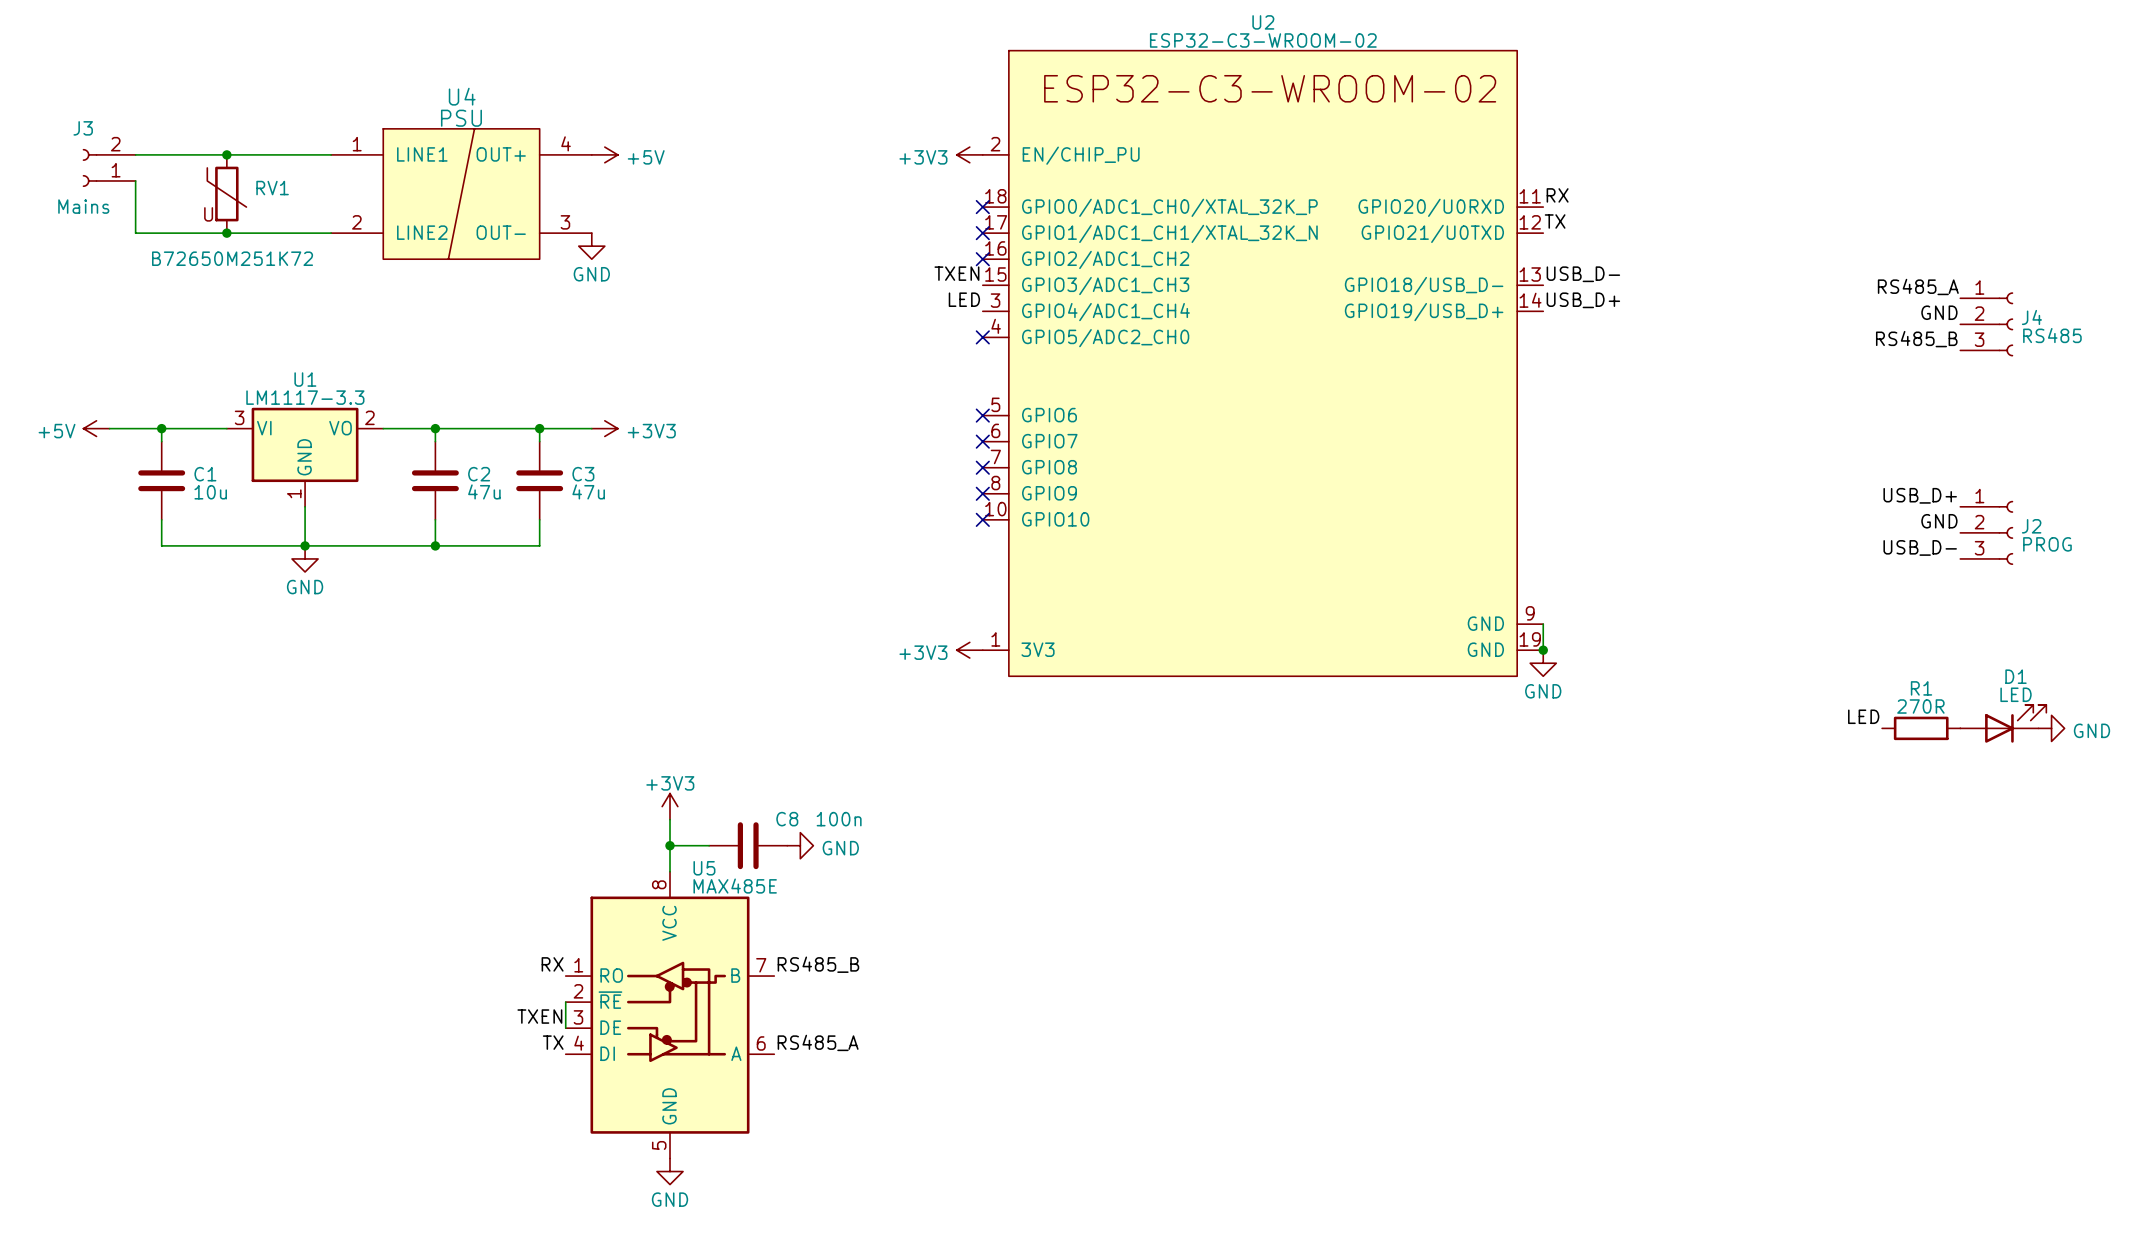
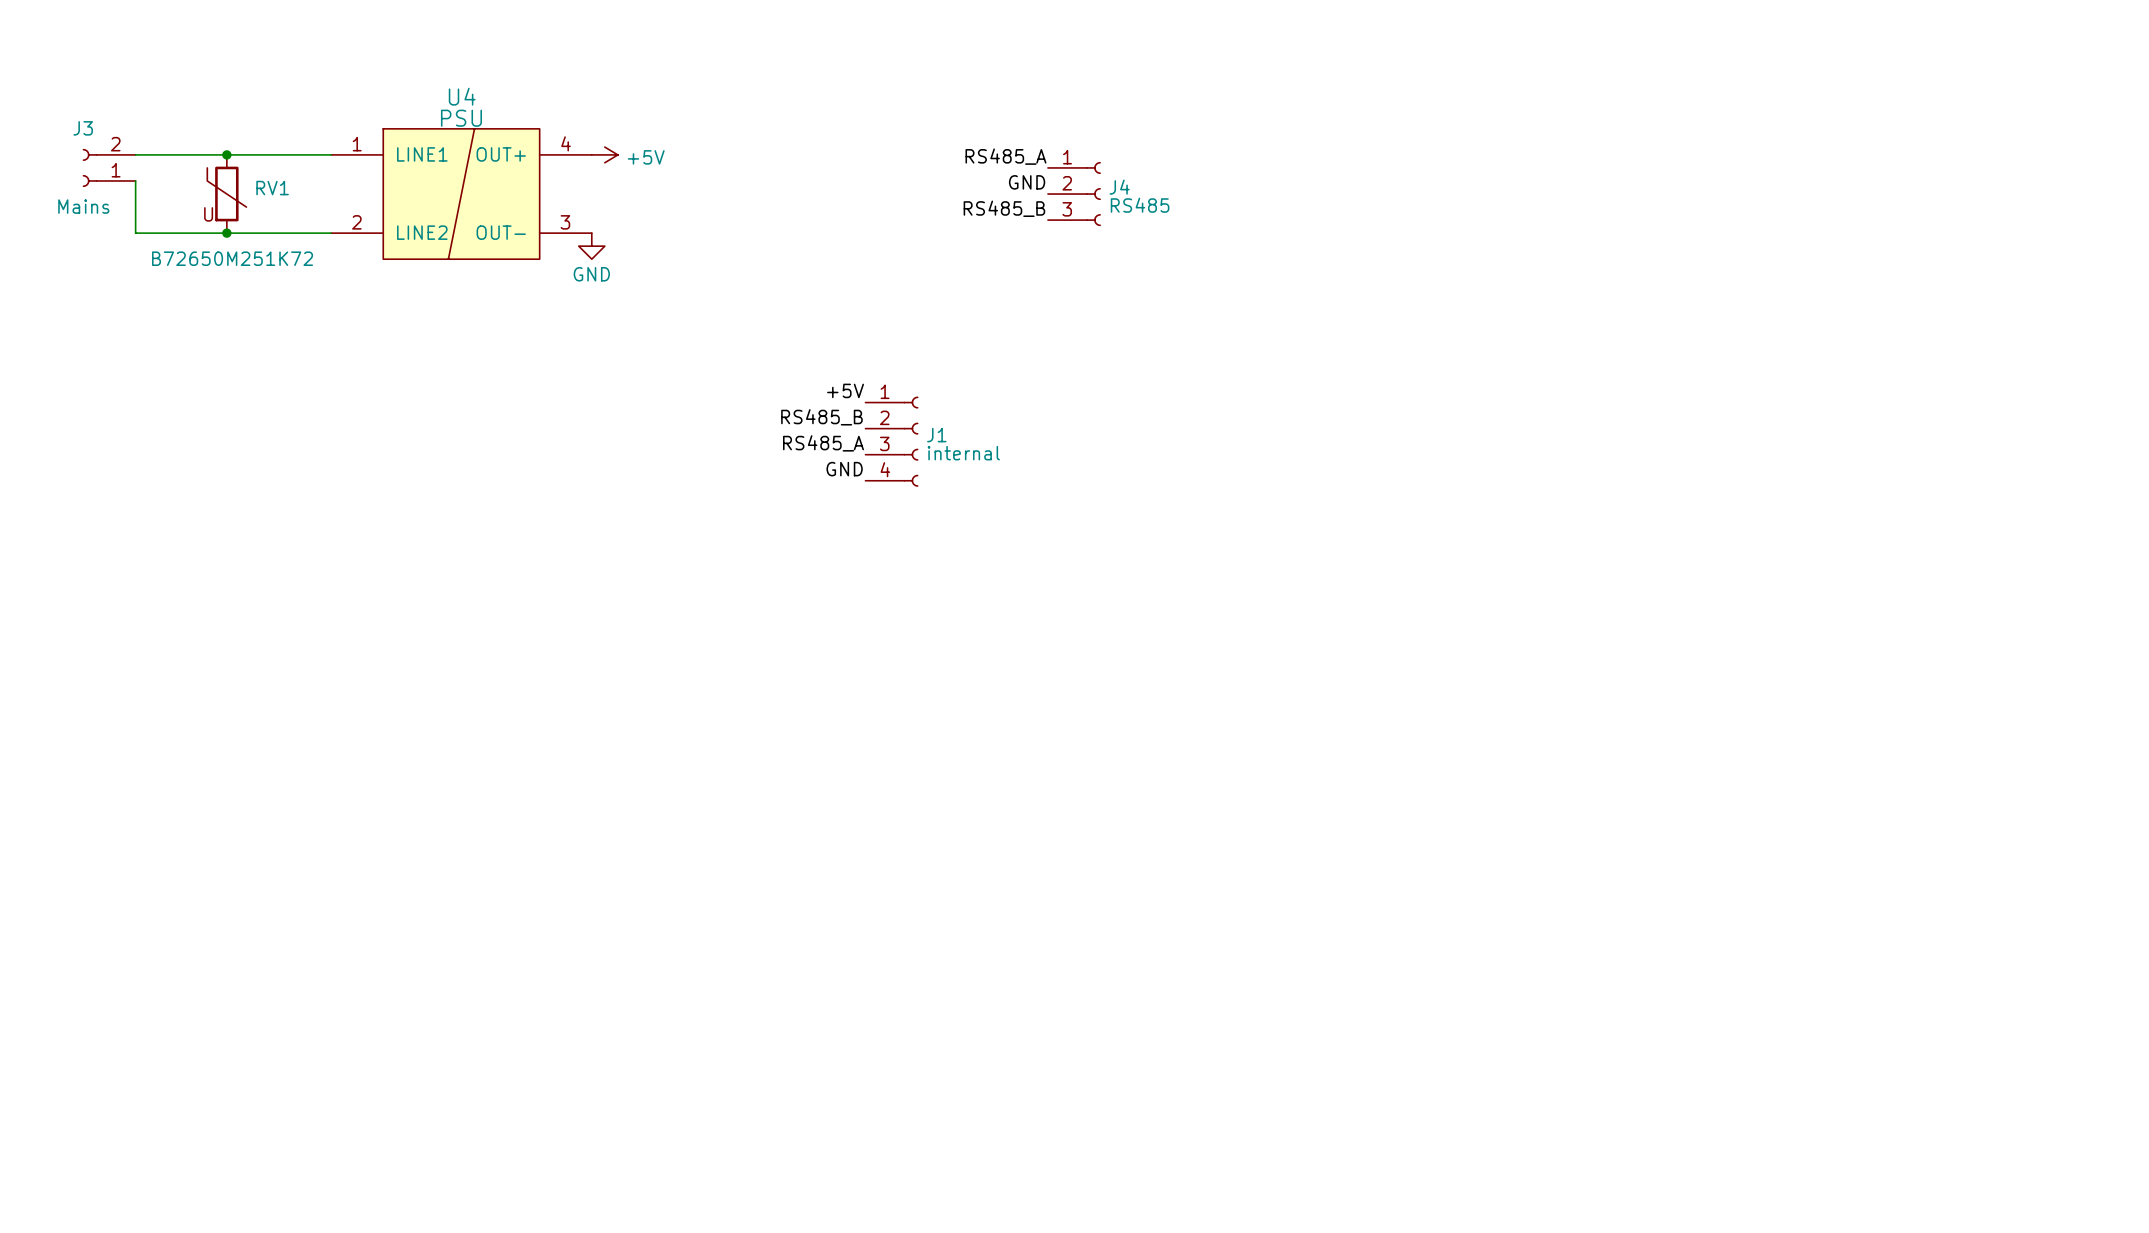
power symbol: +3V3 (969, 154) -> none
label: none -> RS485_A (1005, 156)
label: none -> GND (1027, 182)
label: RX (1557, 195) -> none
no-connect mark: (982, 207) -> none
label: none -> RS485_B (1004, 208)
label: TX (1555, 221) -> none
no-connect mark: (982, 233) -> none
no-connect mark: (982, 259) -> none
label: TXEN (956, 273) -> none
label: USB_D- (1583, 274) -> none
label: RS485_A (1918, 286) -> none
label: LED (964, 299) -> none
label: USB_D+ (1583, 300) -> none
label: GND (1939, 312) -> none
J4 position: (1986, 324) -> (1074, 194)
no-connect mark: (982, 337) -> none
label: RS485_B (1916, 339) -> none
U2: ESP32-C3-WROOM-02 (1263, 363) -> none
label: none -> +5V (845, 390)
no-connect mark: (982, 415) -> none
label: none -> RS485_B (821, 417)
power symbol: +5V (96, 428) -> none
wire: (109, 428) (226, 428) -> none
wire: (161, 428) (161, 441) -> none
junction: (161, 428) -> none
wire: (383, 428) (591, 428) -> none
wire: (435, 428) (435, 441) -> none
junction: (435, 428) -> none
wire: (539, 428) (539, 441) -> none
junction: (539, 428) -> none
power symbol: +3V3 (604, 428) -> none
J1: none -> internal (891, 441)
no-connect mark: (982, 441) -> none
label: none -> RS485_A (823, 443)
U1: LM1117-3.3 (305, 457) -> none
no-connect mark: (982, 467) -> none
label: none -> GND (844, 469)
C1: 10u (161, 480) -> none
C2: 47u (435, 480) -> none
C3: 47u (539, 480) -> none
no-connect mark: (982, 493) -> none
label: USB_D+ (1920, 495) -> none
wire: (305, 506) (305, 545) -> none
wire: (161, 519) (161, 545) (539, 545) (539, 519) -> none
wire: (435, 519) (435, 545) -> none
no-connect mark: (982, 519) -> none
label: GND (1939, 521) -> none
J2: PROG (1986, 532) -> none
junction: (305, 545) -> none
junction: (435, 545) -> none
label: USB_D- (1920, 547) -> none
power symbol: GND (305, 558) -> none
wire: (1543, 624) (1543, 650) -> none
power symbol: +3V3 (969, 650) -> none
junction: (1543, 650) -> none
power symbol: GND (1543, 663) -> none
label: LED (1863, 716) -> none
D1: LED (2003, 723) -> none
R1: 270R (1921, 728) -> none
power symbol: GND (2051, 728) -> none
power symbol: +3V3 (670, 806) -> none
wire: (670, 819) (670, 871) -> none
wire: (670, 845) (709, 845) -> none
junction: (670, 845) -> none
C8: 100n (748, 845) -> none
power symbol: GND (800, 845) -> none
label: RX (552, 964) -> none
label: RS485_B (818, 964) -> none
wire: (565, 1002) (565, 1028) -> none
U5: MAX485E (670, 1015) -> none
label: TXEN (539, 1016) -> none
label: TX (553, 1042) -> none
label: RS485_A (818, 1042) -> none
power symbol: GND (670, 1171) -> none

